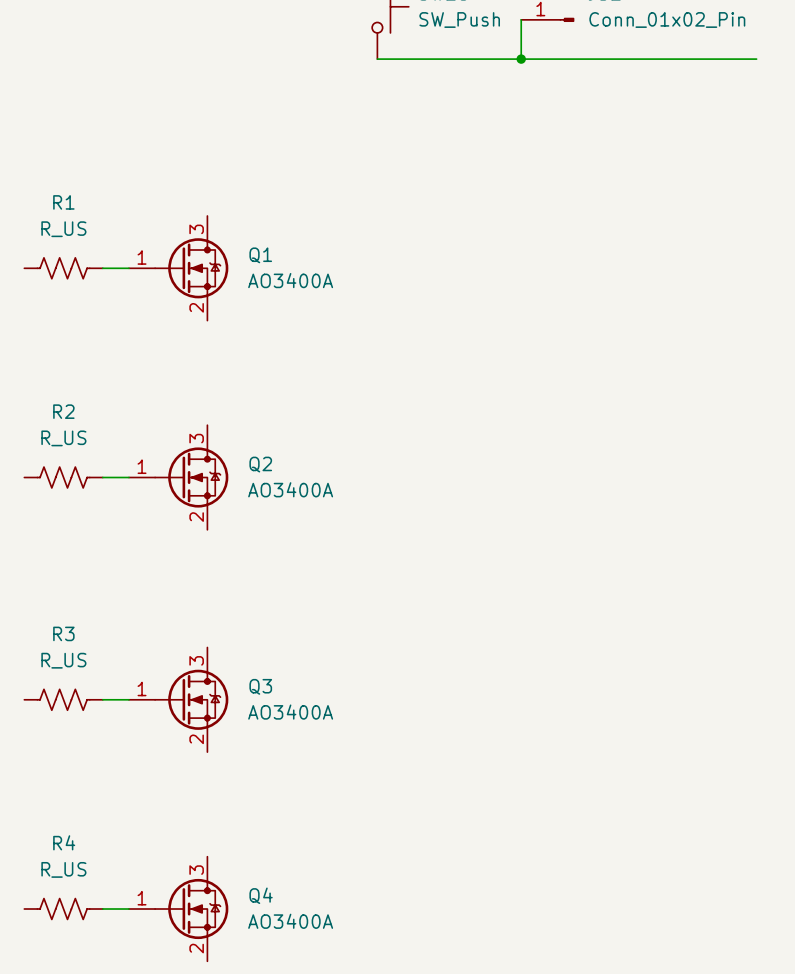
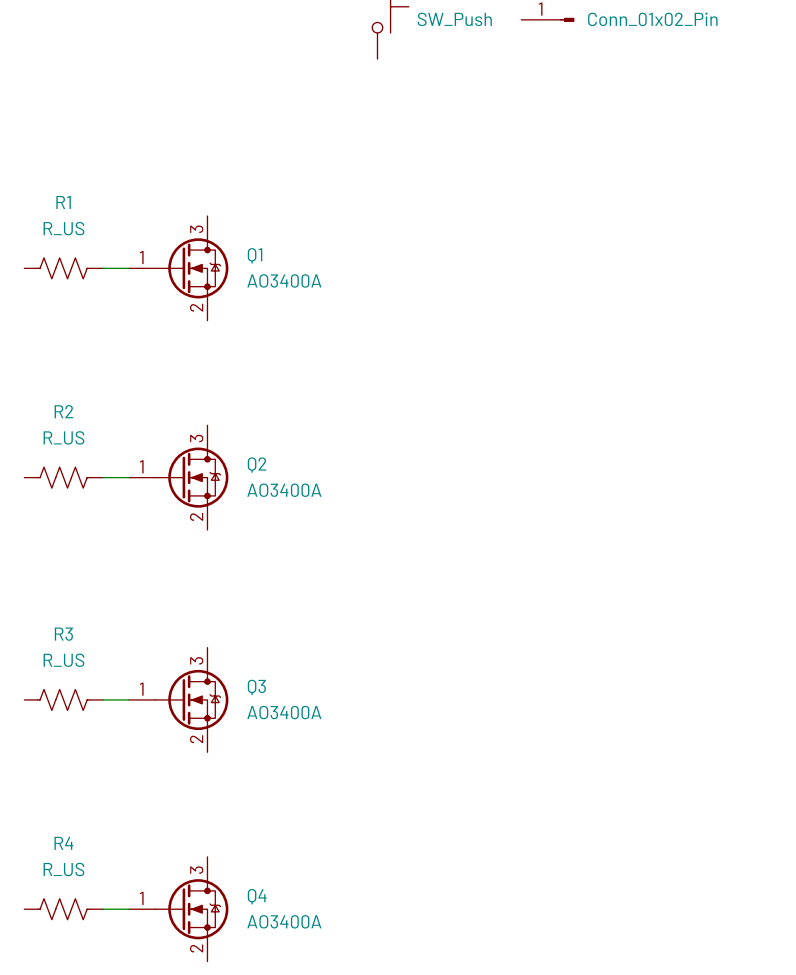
wire: (521, 19) (521, 59) -> none
wire: (377, 59) (756, 59) -> none
junction: (521, 59) -> none

